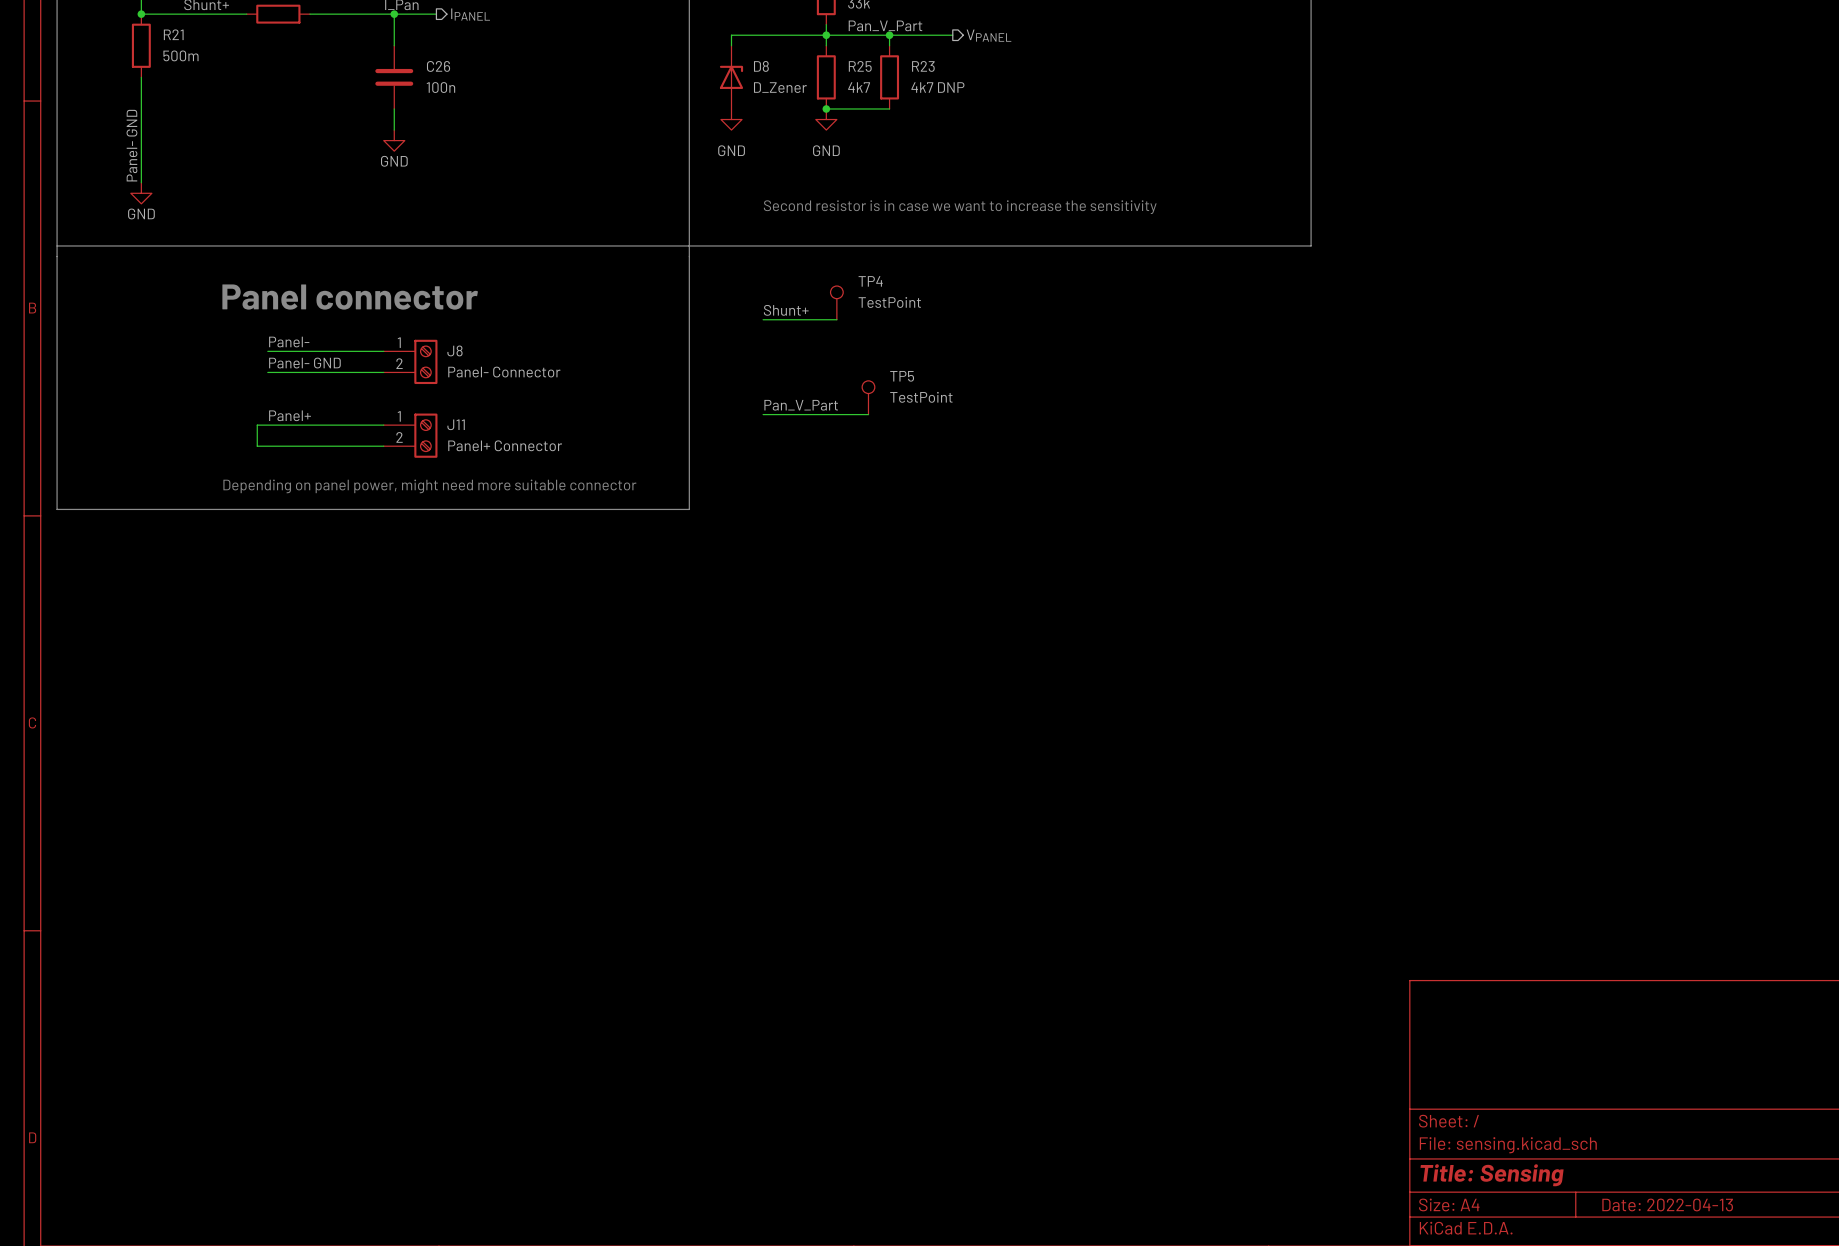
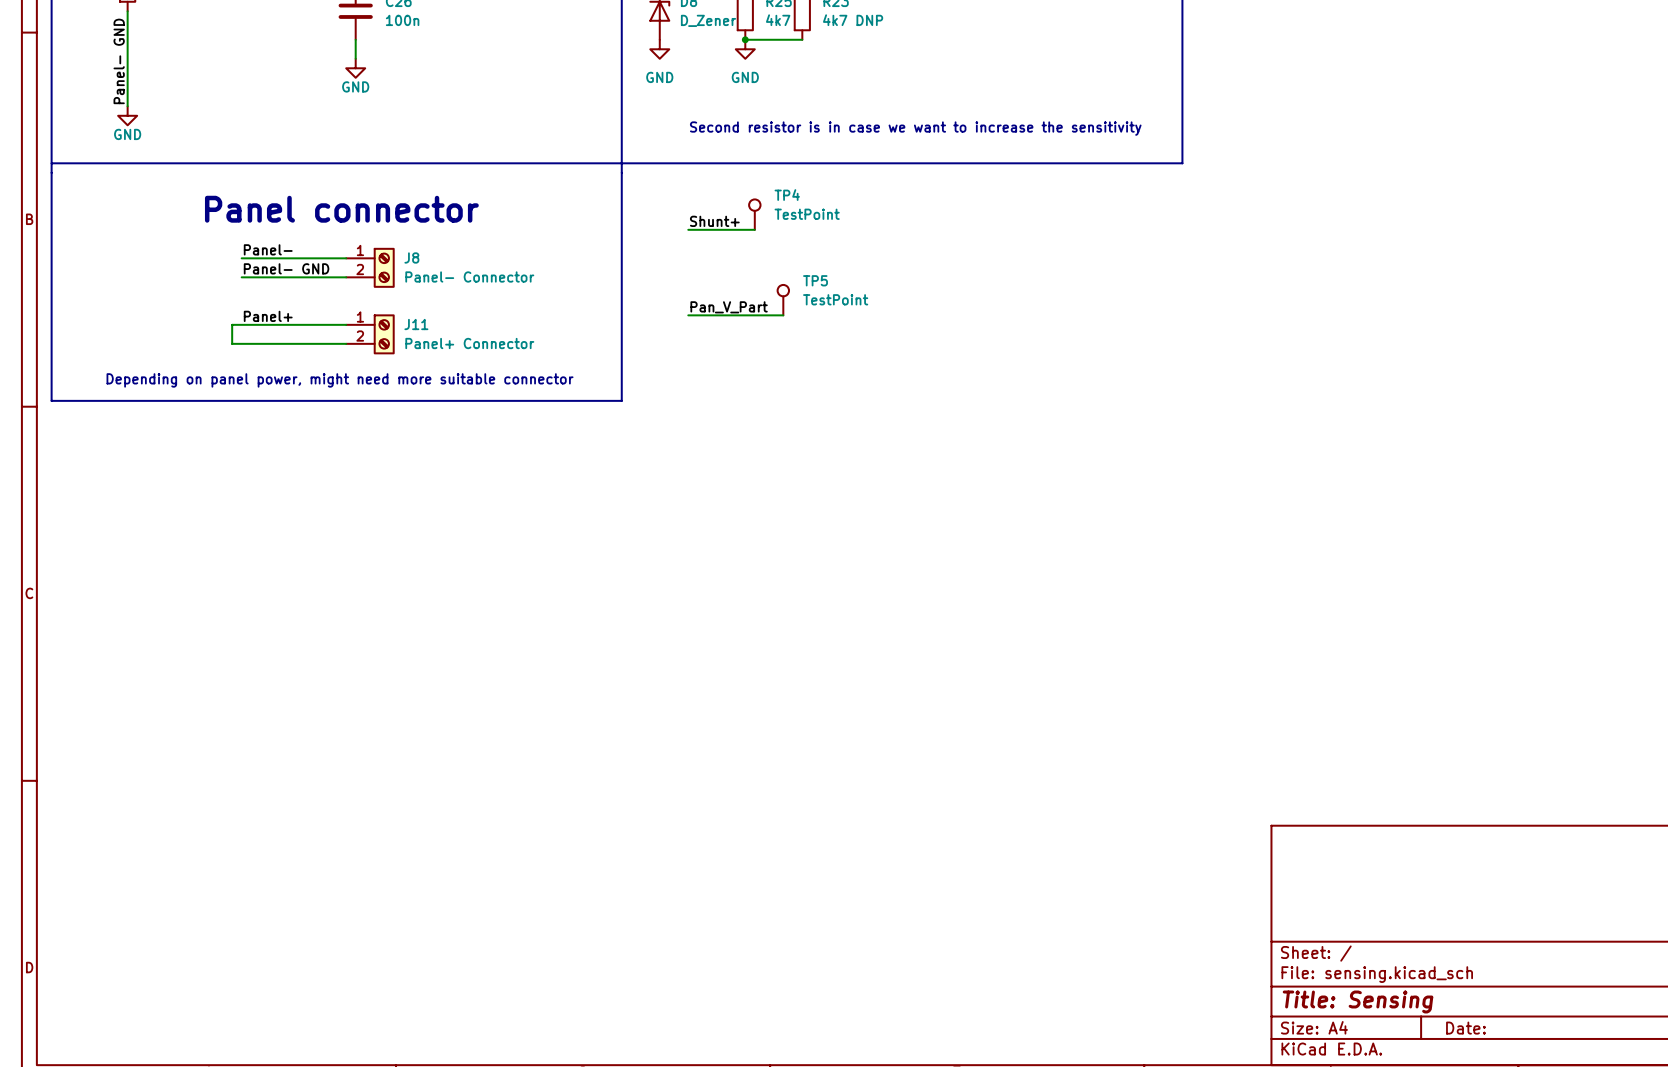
title block: Date: 2022-04-13 (1667, 1204) -> Date: (1465, 1028)

